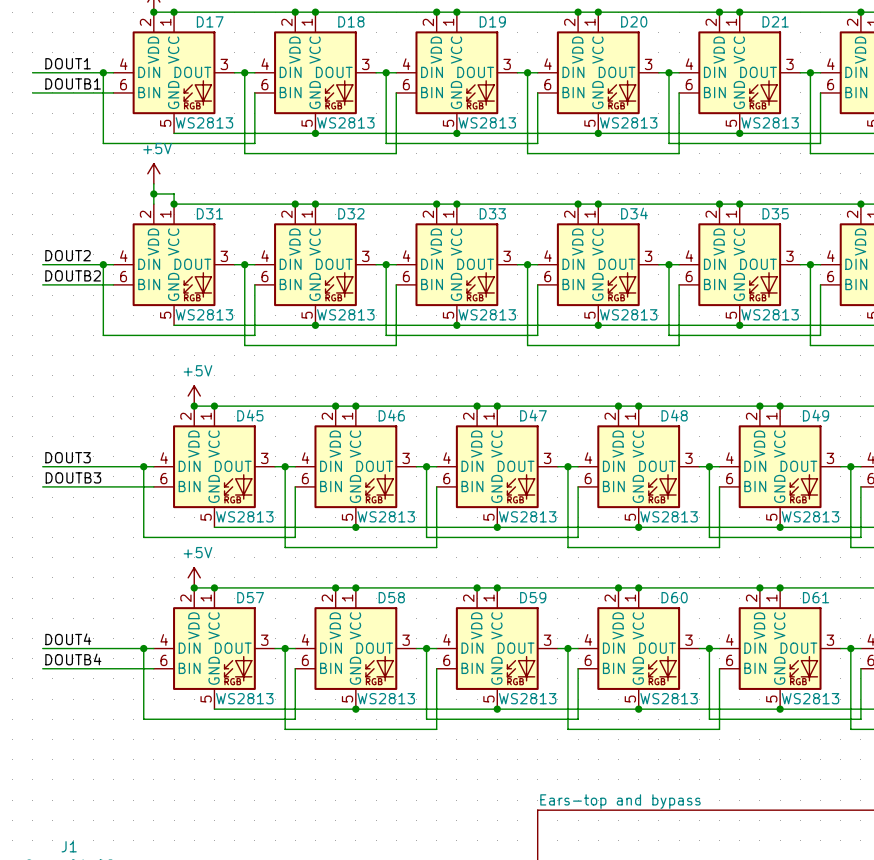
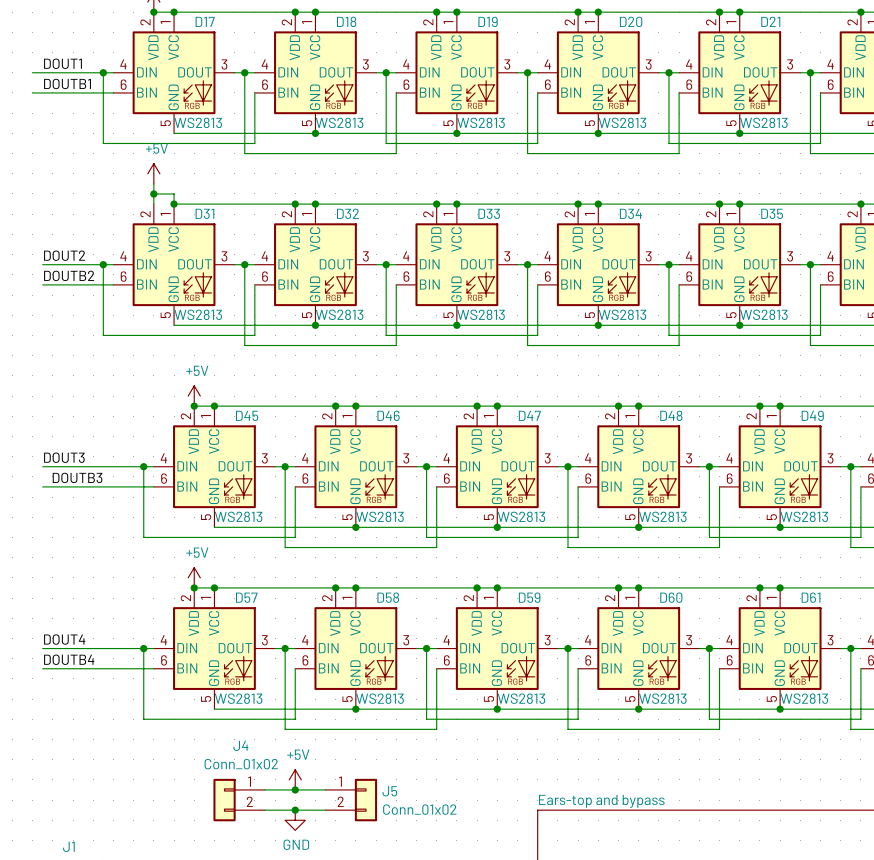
power symbol: none -> +5V (295, 779)
wire: none -> (264, 789) (325, 789)
junction: none -> (295, 789)
J4: none -> Conn_01x02 (239, 800)
J5: none -> Conn_01x02 (351, 800)
wire: none -> (264, 810) (325, 810)
junction: none -> (295, 810)
power symbol: none -> GND (295, 820)

